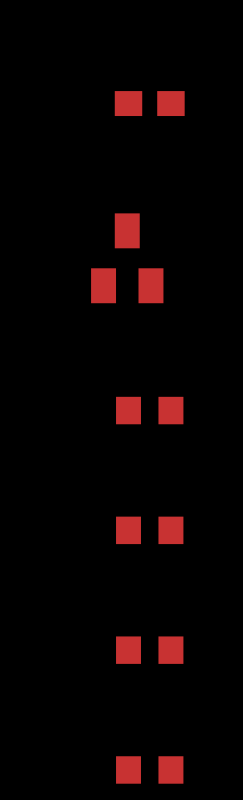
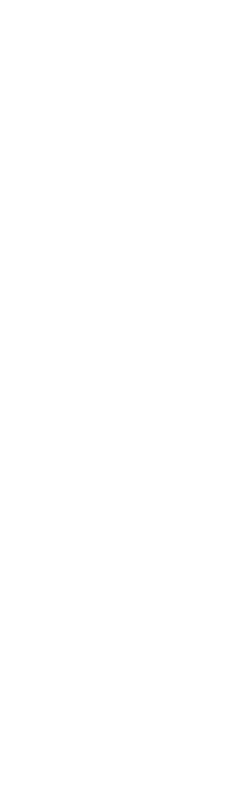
part: (149, 103) -> none
part: (127, 258) -> none
part: (149, 410) -> none
part: (149, 530) -> none
part: (149, 650) -> none
part: (149, 769) -> none

